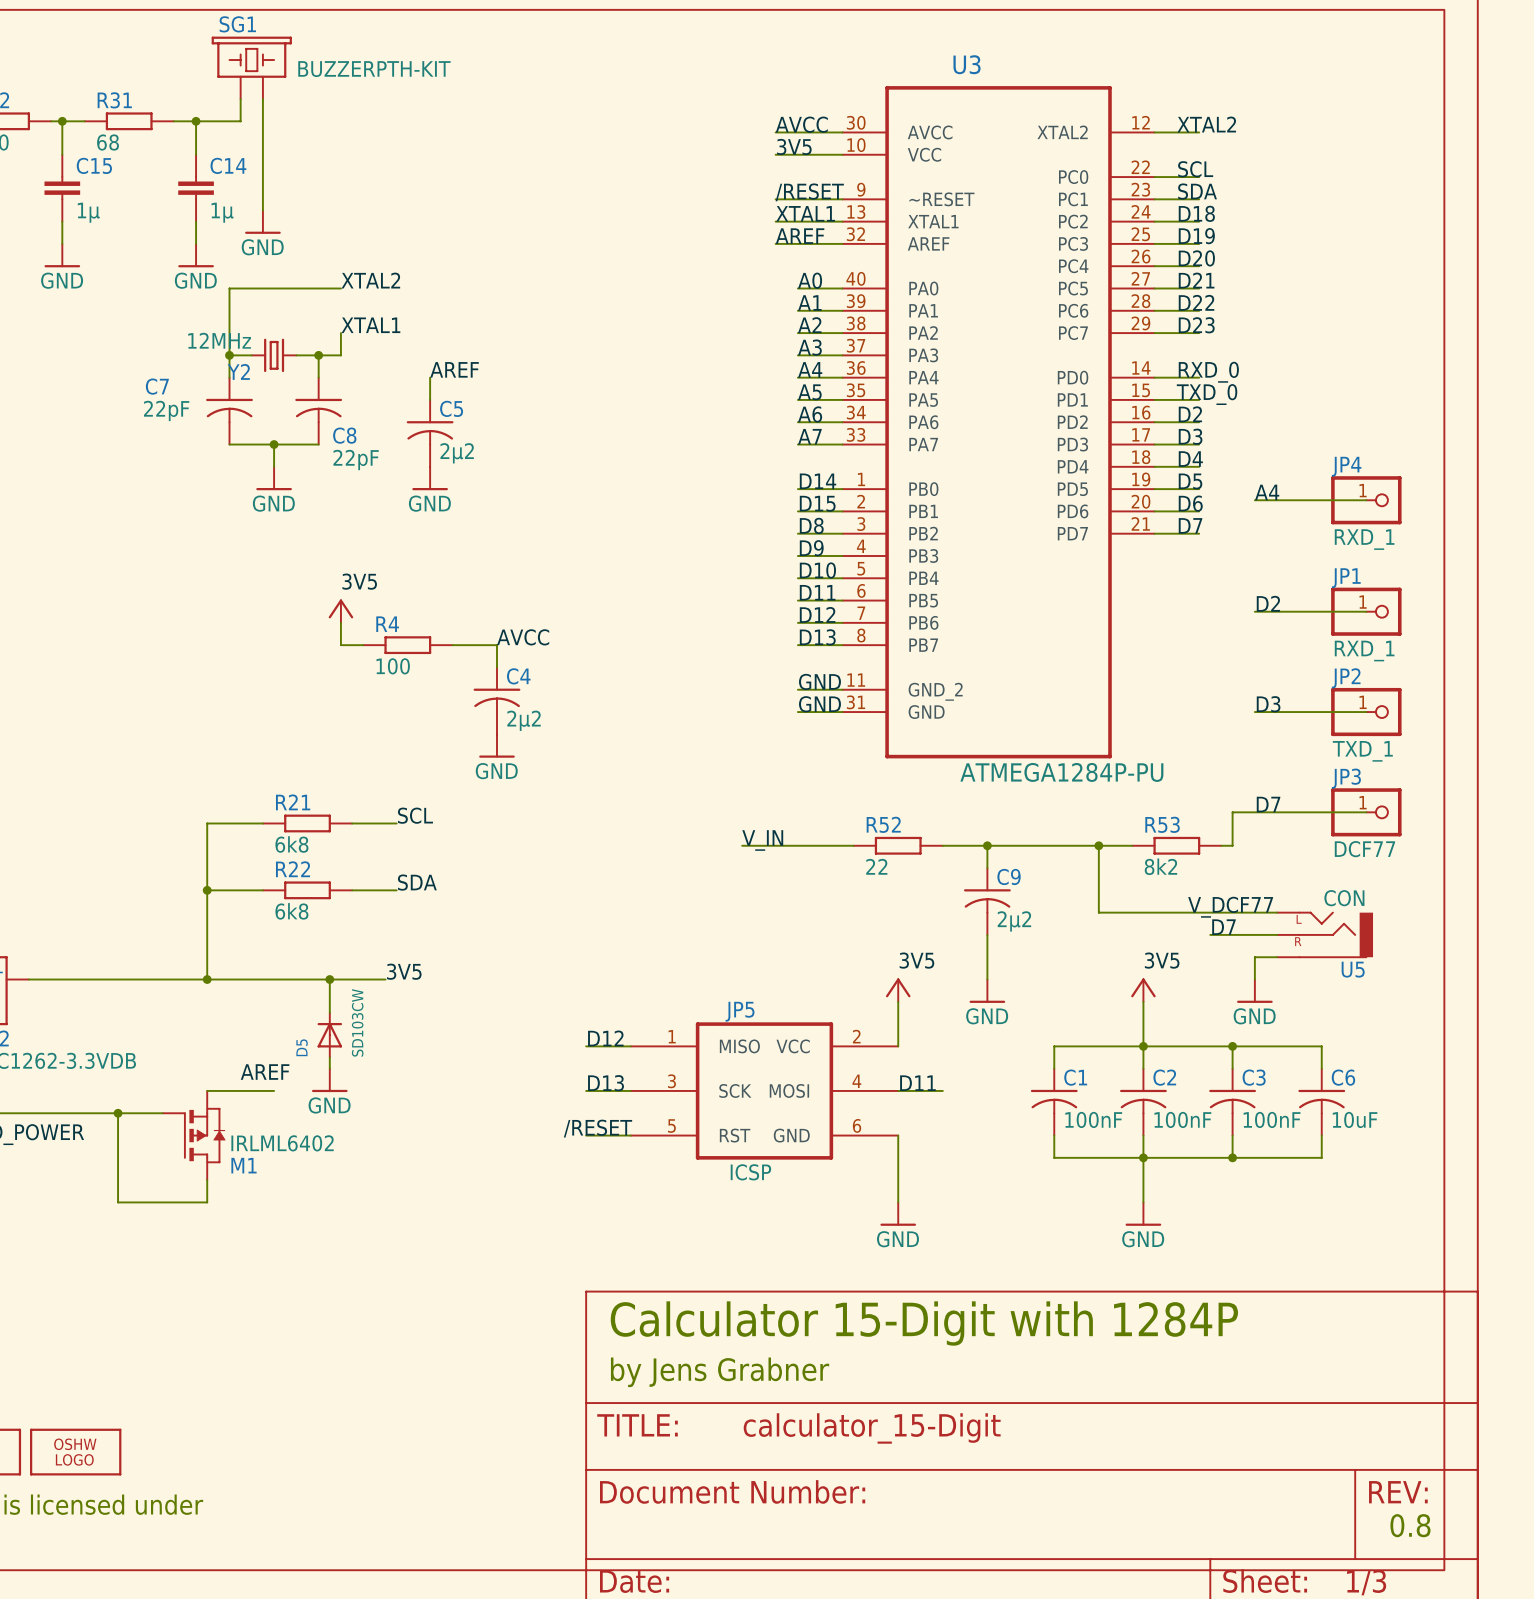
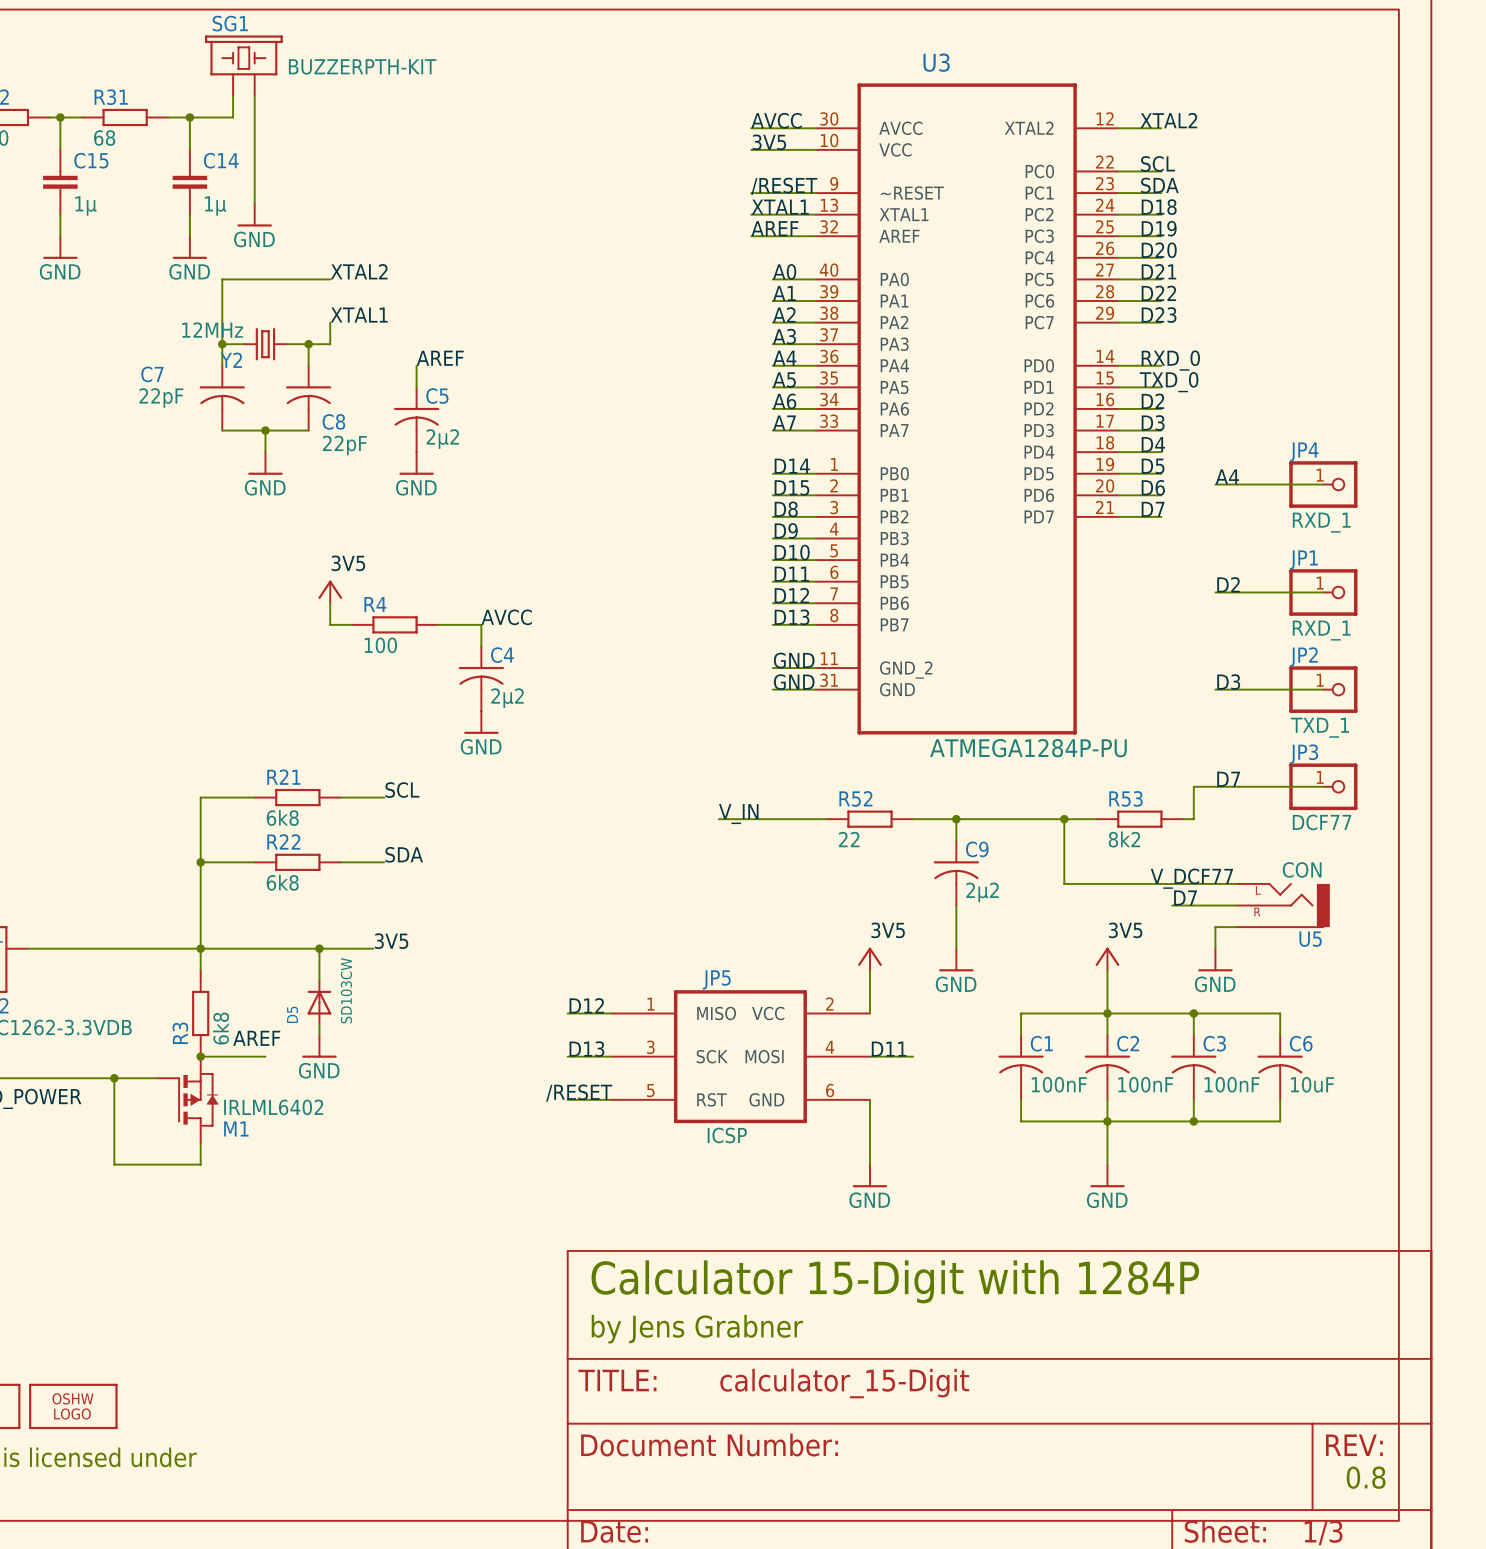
wire: none -> (200, 948) (200, 970)
R3: none -> 6k8 (200, 1013)
junction: none -> (200, 1056)

